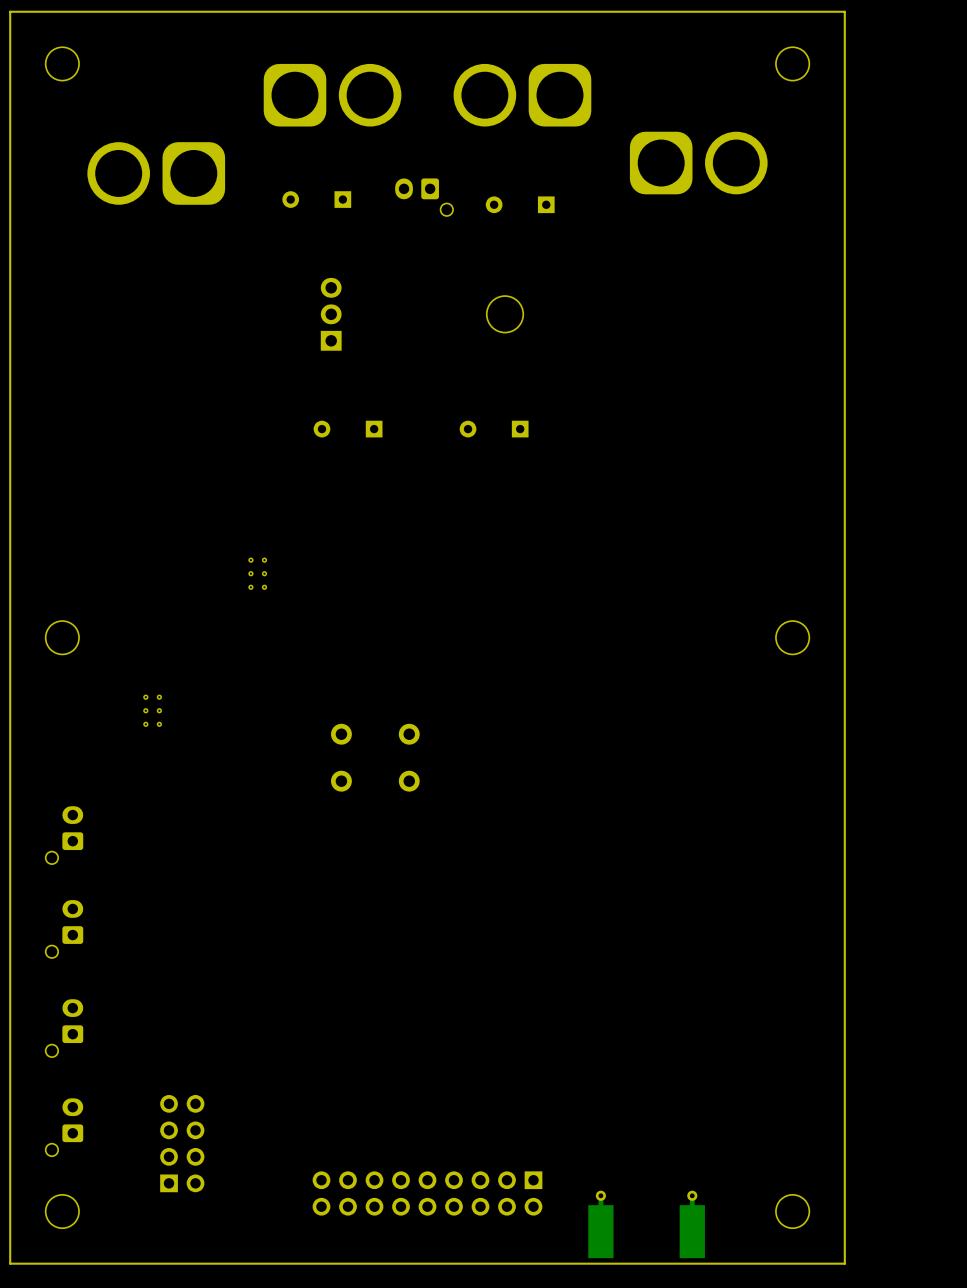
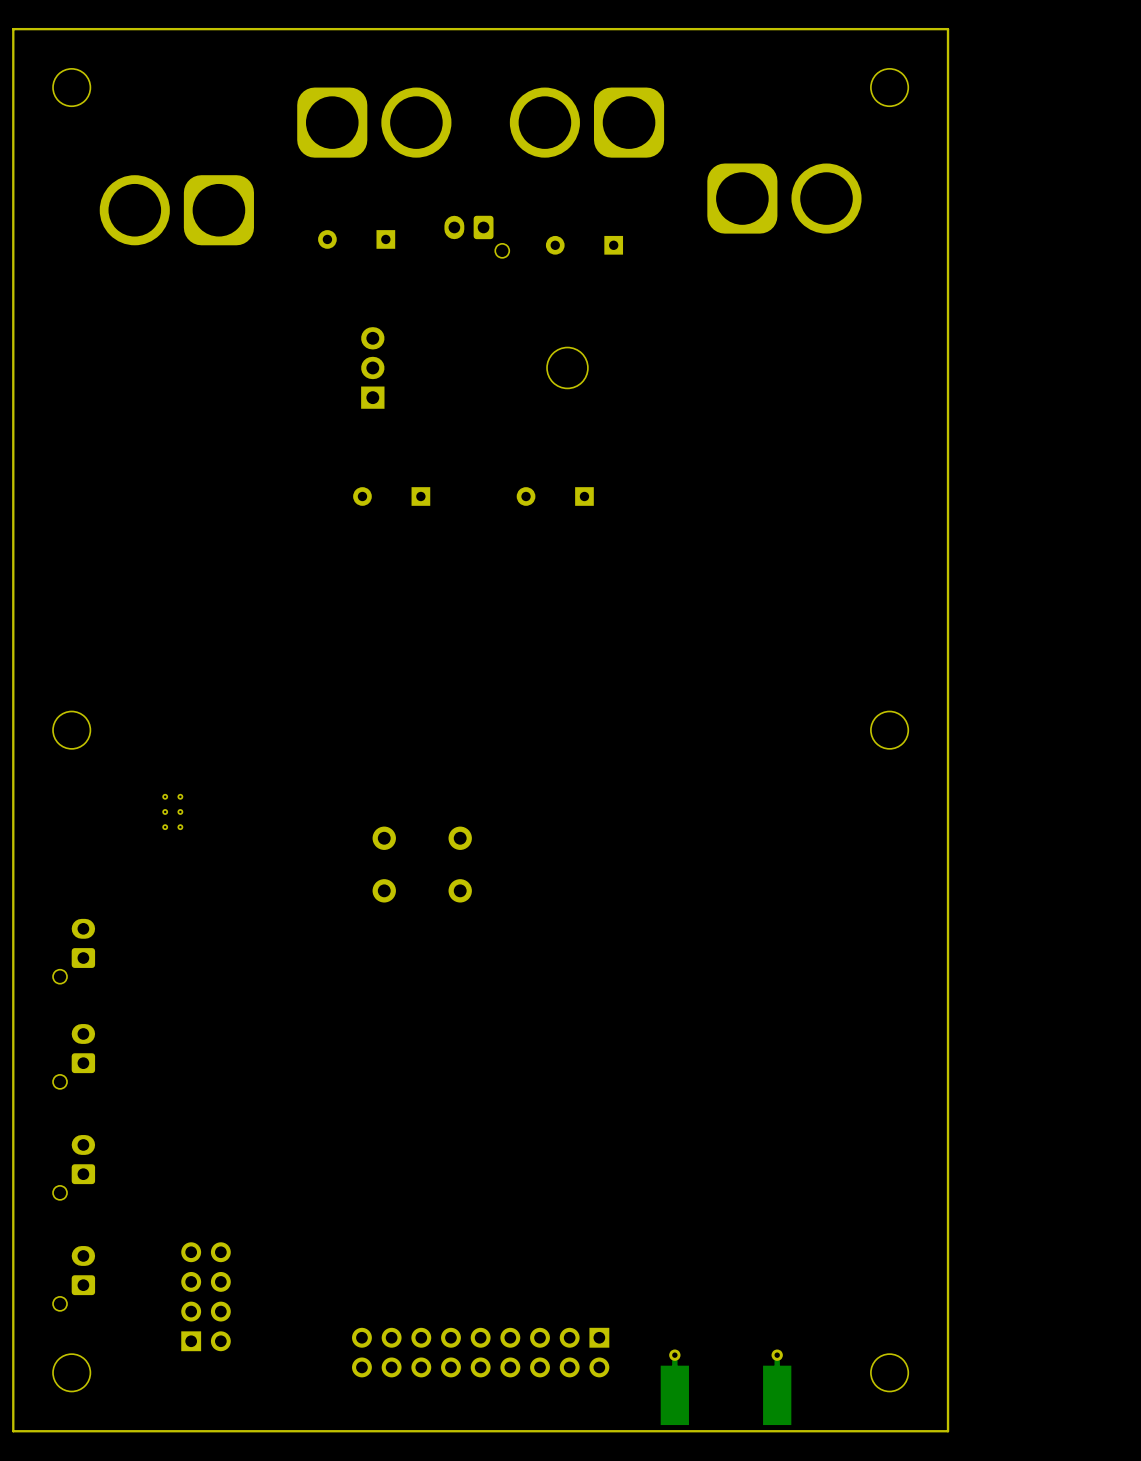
part: (257, 573) -> none

